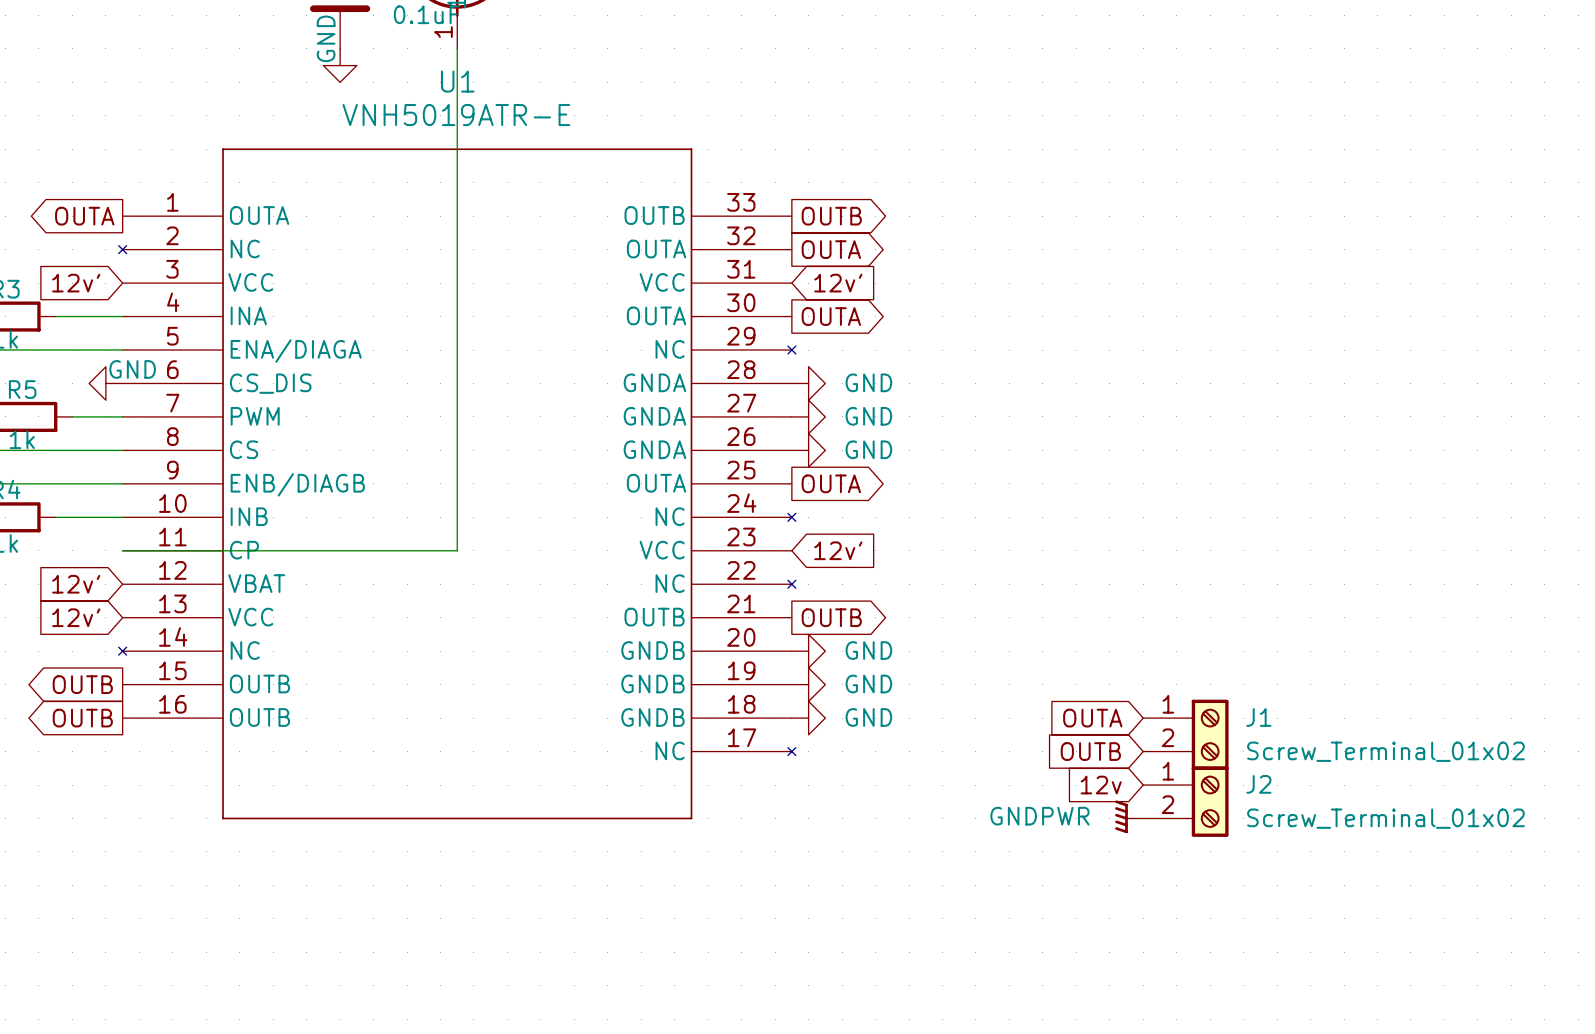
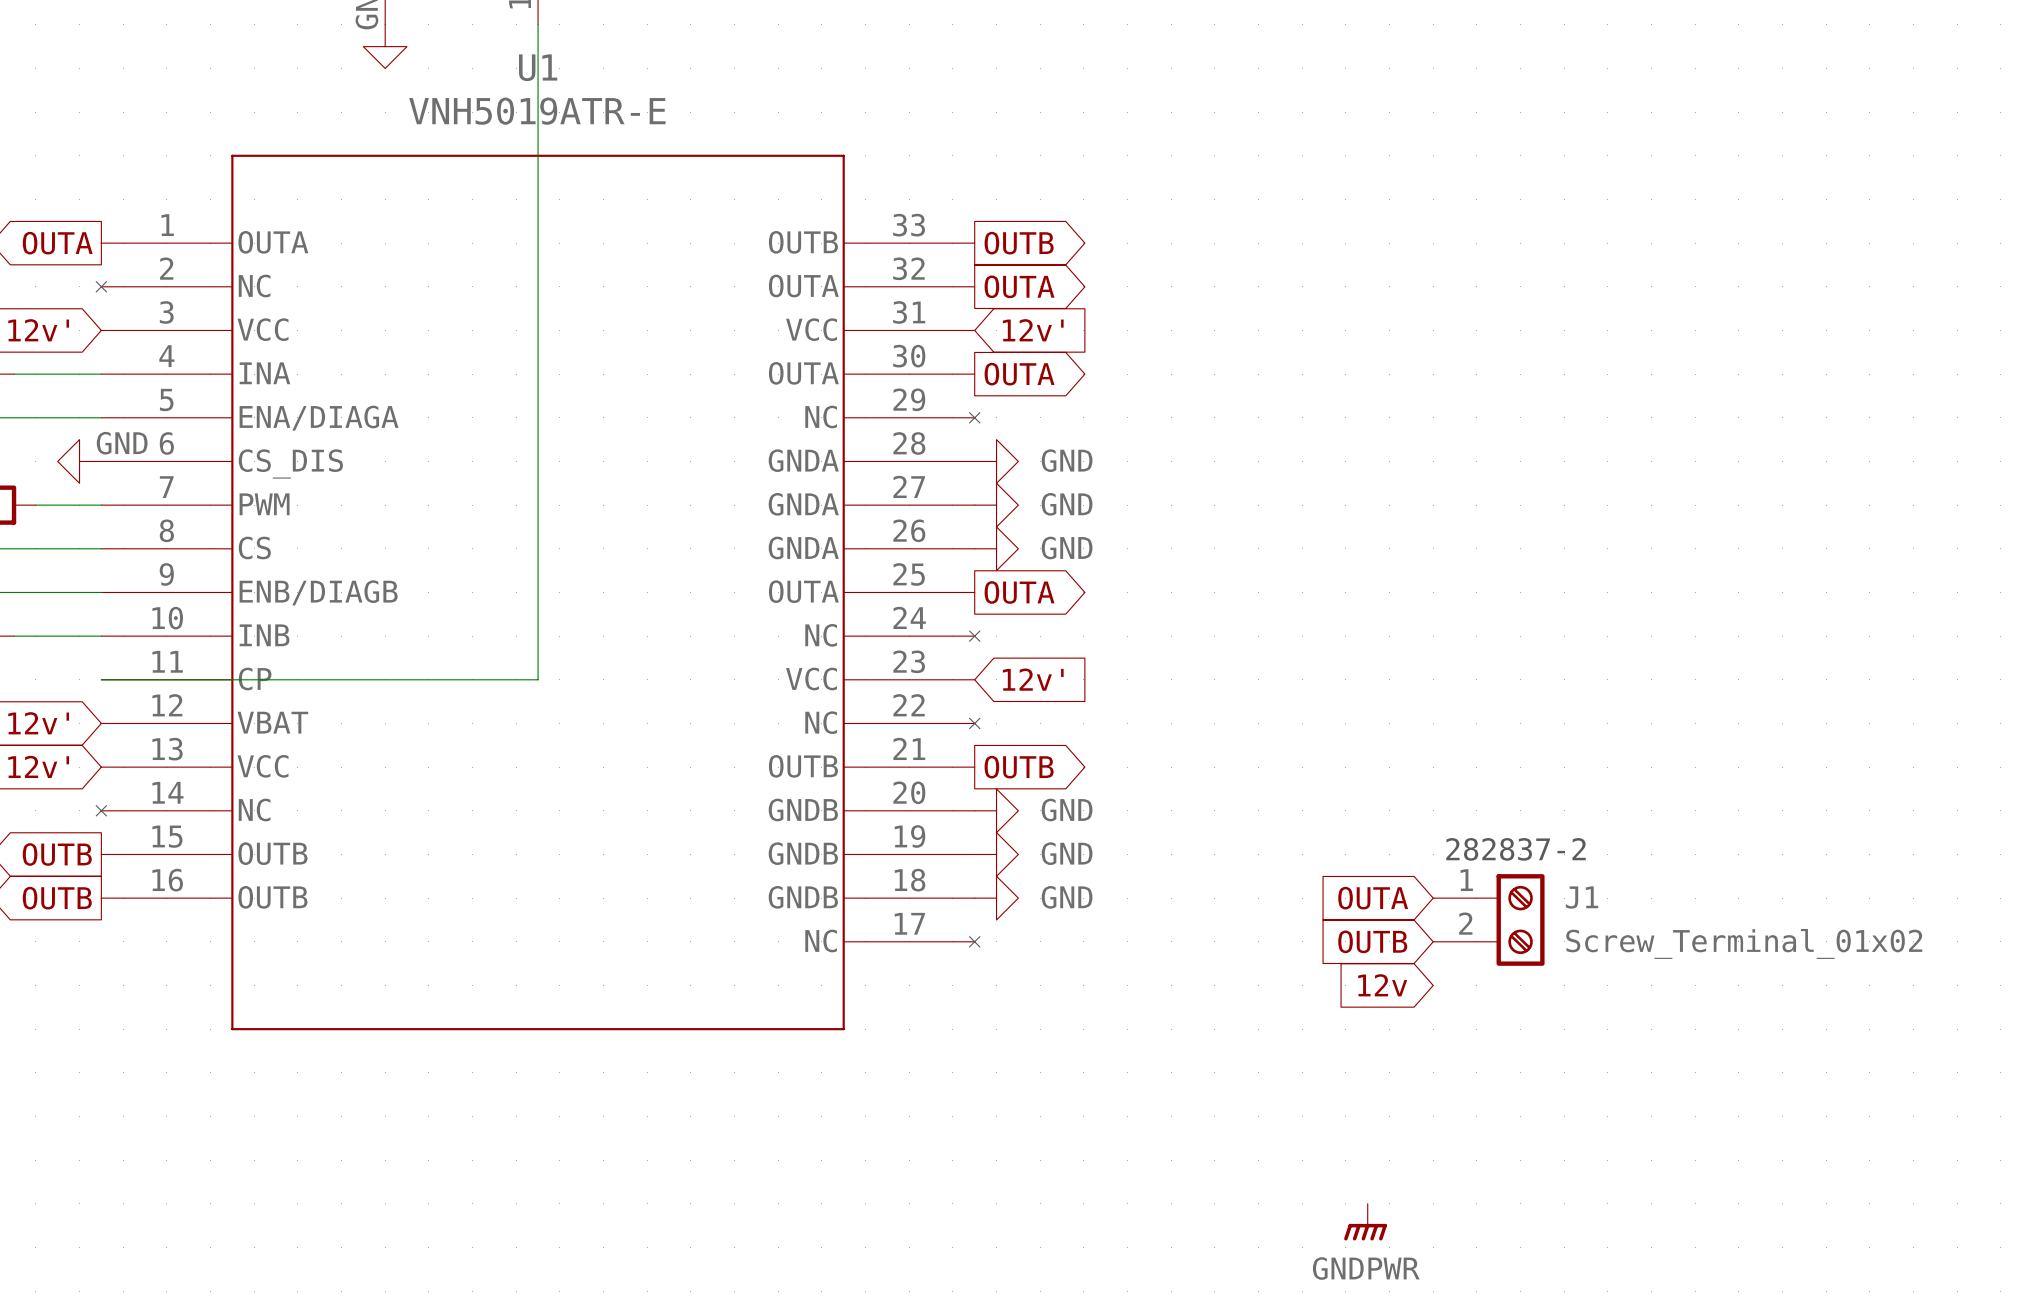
text: none -> 282837-2 (1516, 849)
J2: Screw_Terminal_01x02 (1185, 801) -> none
power symbol text position: GNDPWR (1039, 816) -> GNDPWR (1366, 1268)
power symbol rotation: 0° (1129, 816) -> 90° counterclockwise (1365, 1222)
power symbol position: GNDPWR (1129, 816) -> GNDPWR (1365, 1222)

